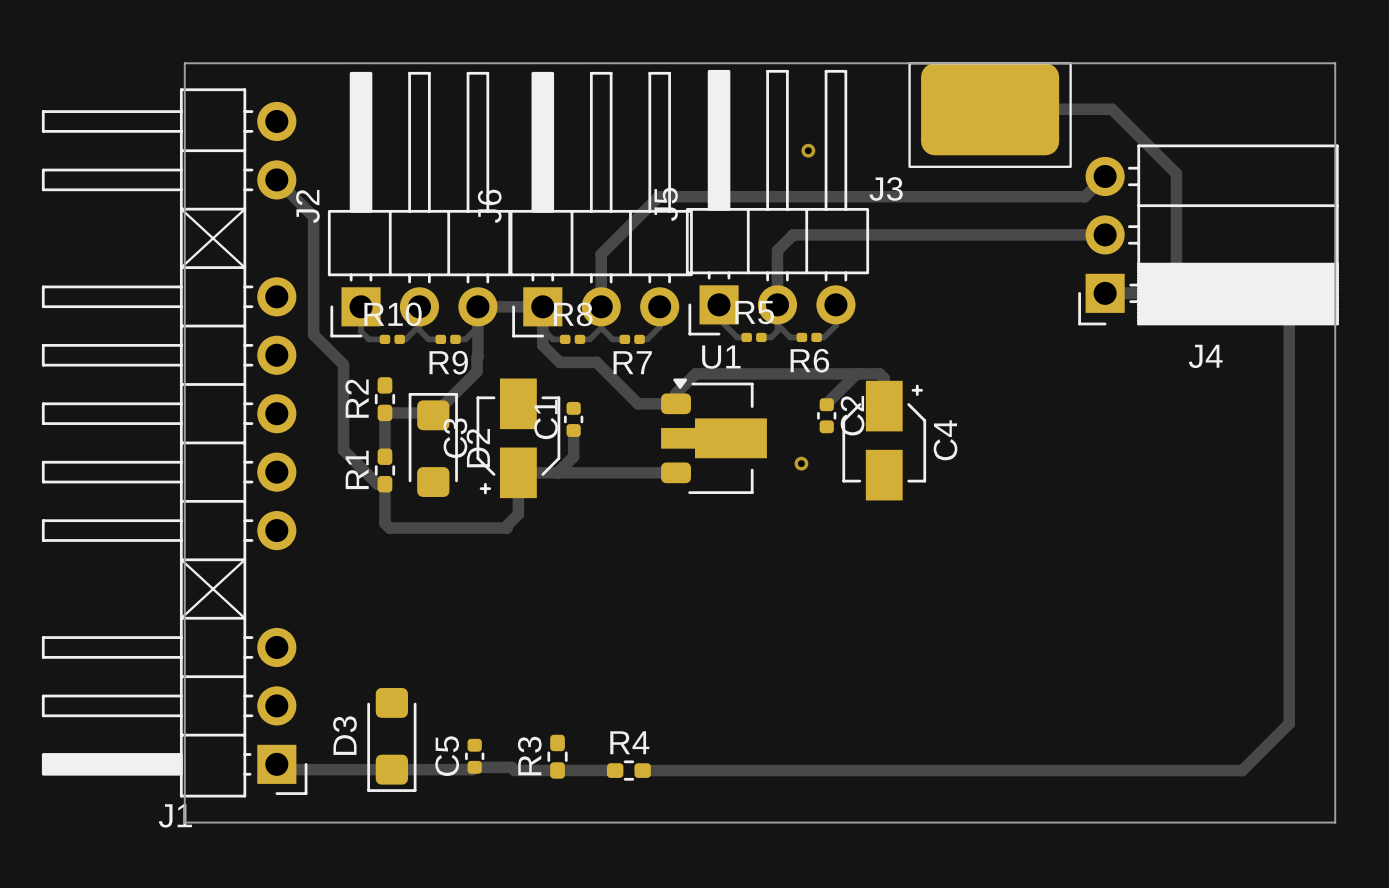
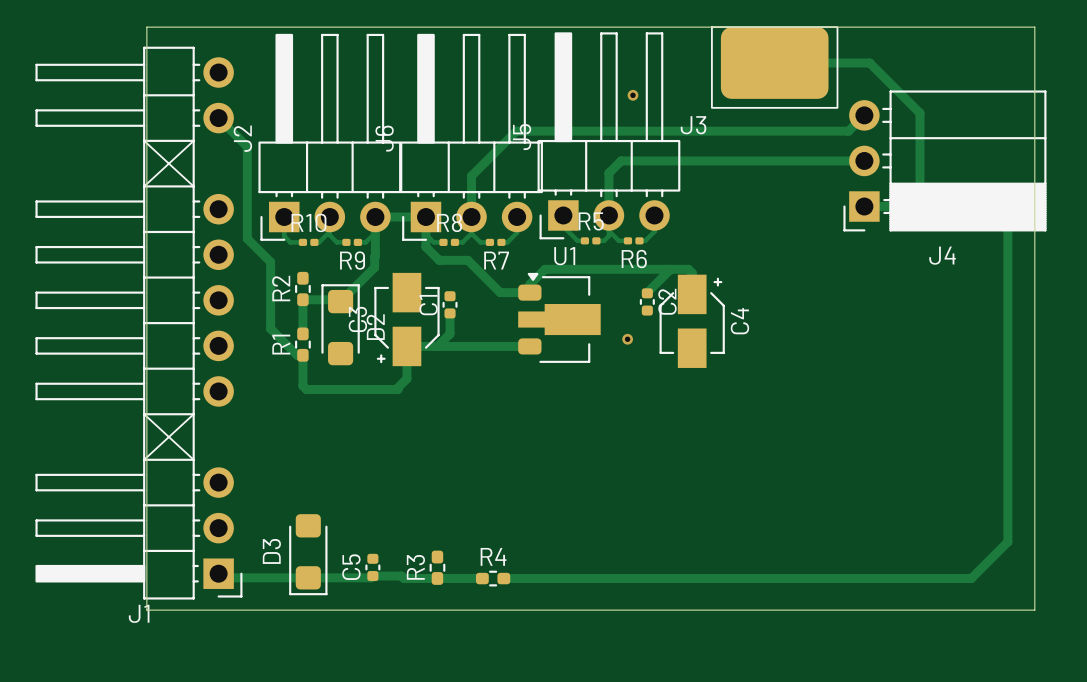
board edge: (1323, 63) (1335, 63) (1335, 822) (184, 822) (184, 811) -> (1034, 27) (1034, 610) (146, 610)

